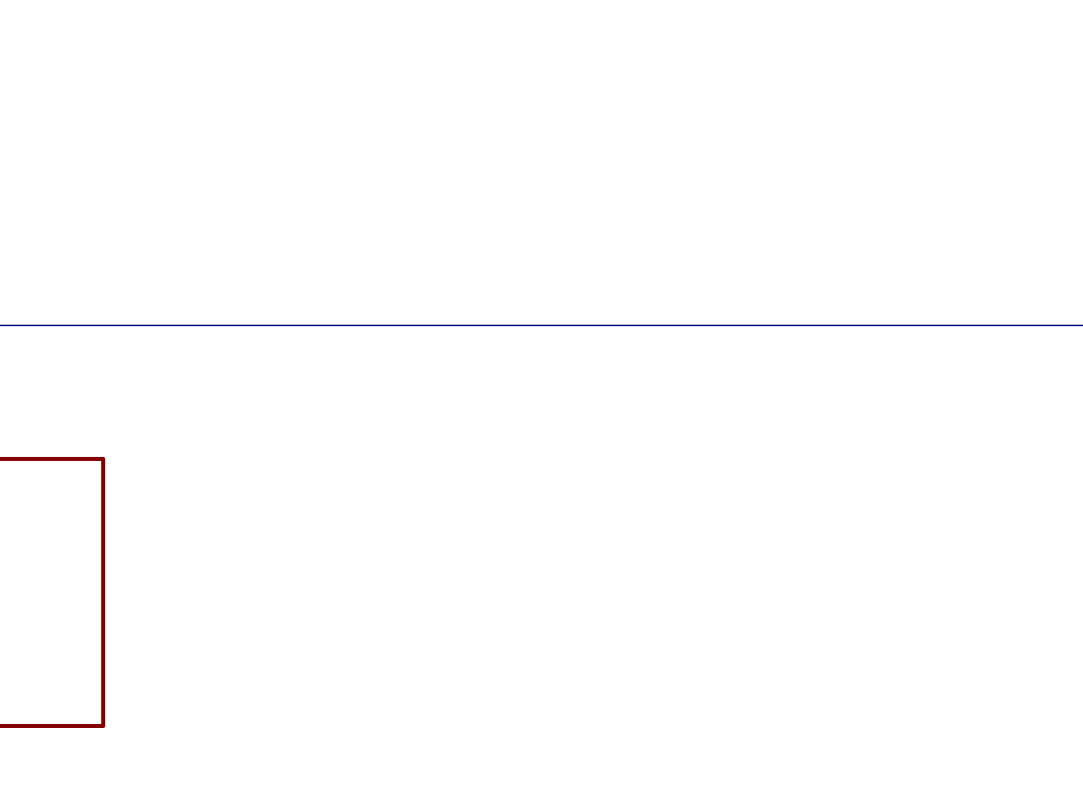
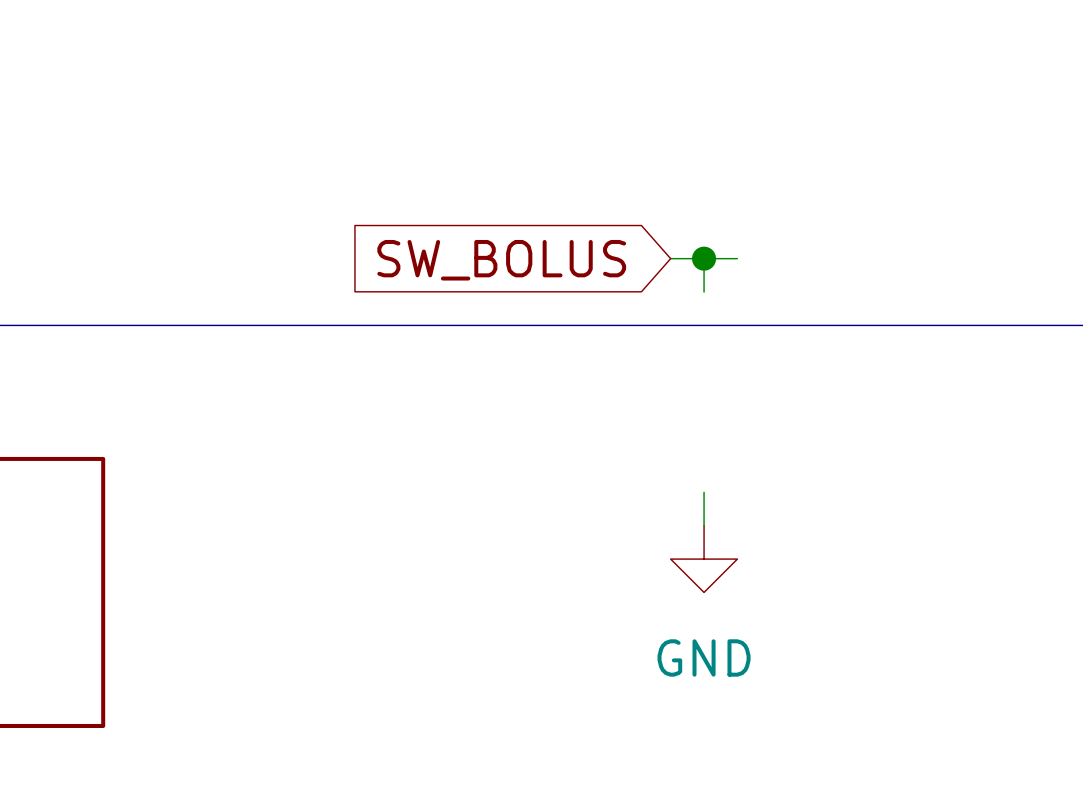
wire: none -> (670, 258) (737, 258)
wire: none -> (704, 258) (704, 292)
junction: none -> (704, 258)
global label: none -> SW_BOLUS (501, 260)
wire: none -> (704, 492) (704, 525)
power symbol: none -> GND (704, 559)

